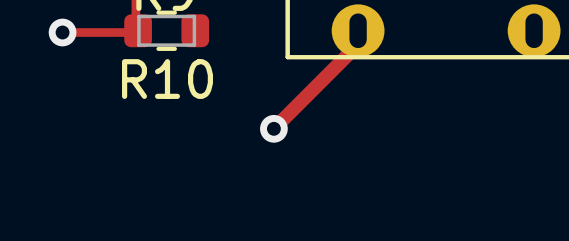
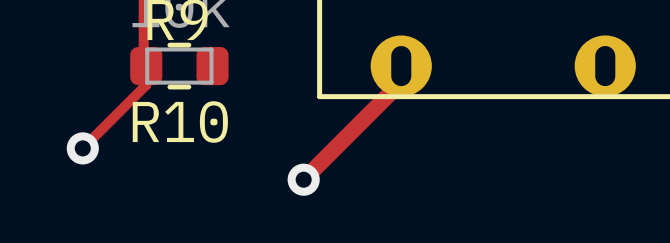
track: (138, 30) (136, 32) (62, 32) -> (146, 66) (146, 84) (82, 148)
via position: (62, 32) -> (82, 148)

